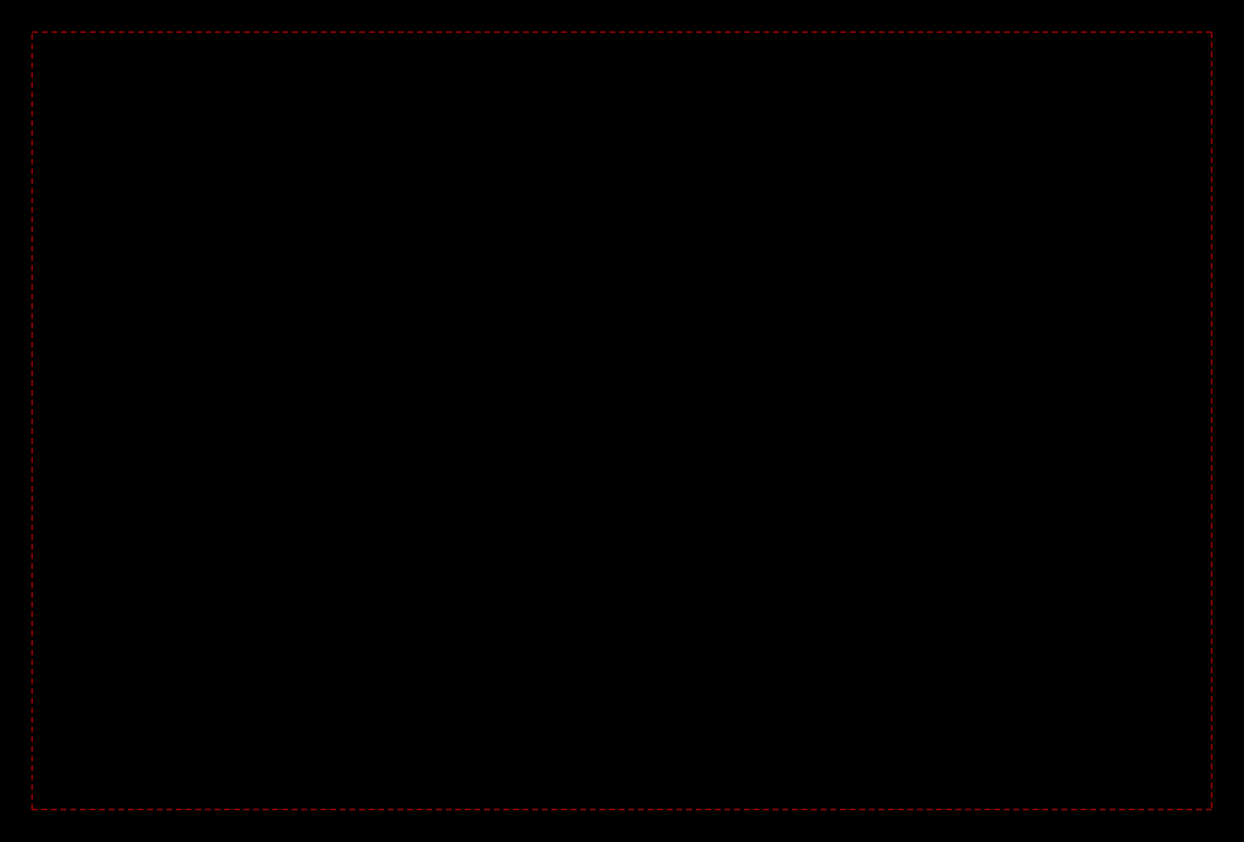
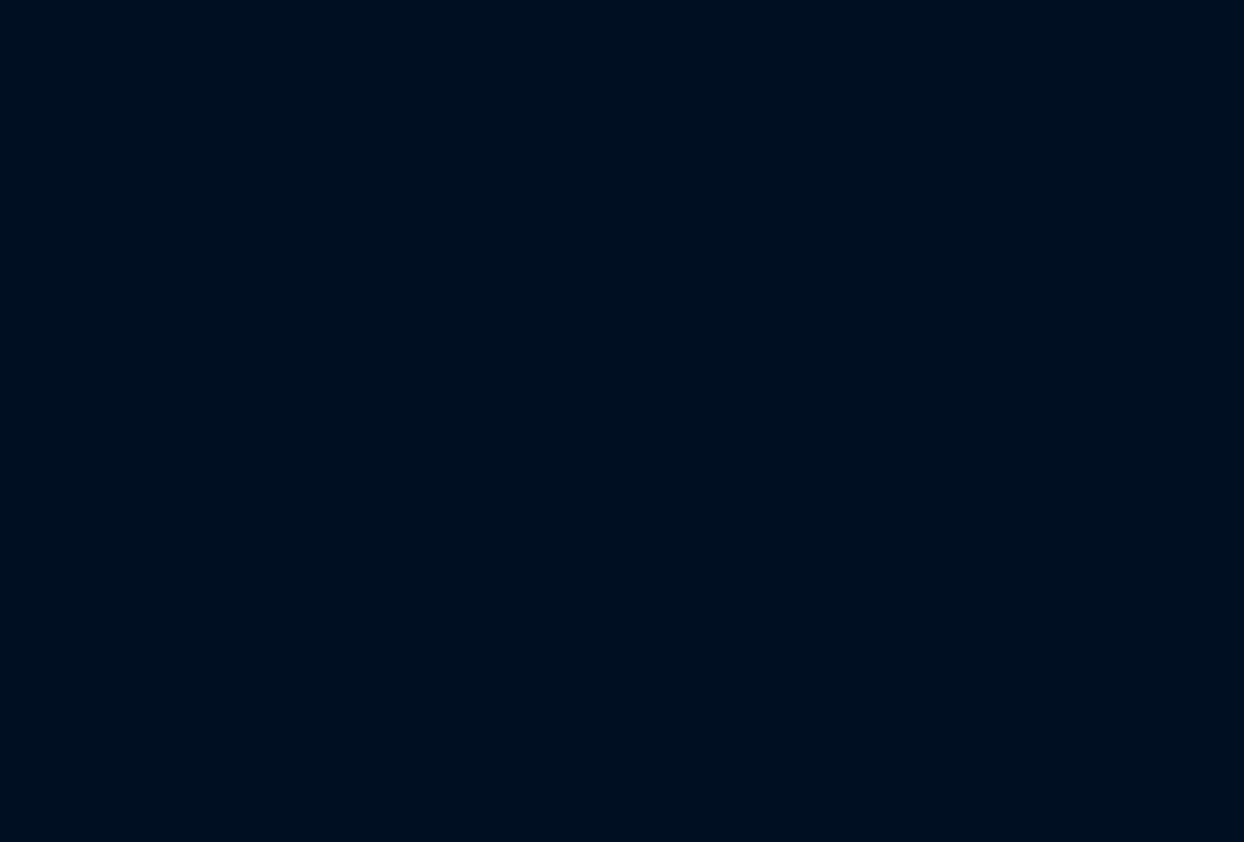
zone outline: (32, 32) (1211, 32) (1211, 809) (32, 809) (32, 32) -> none

